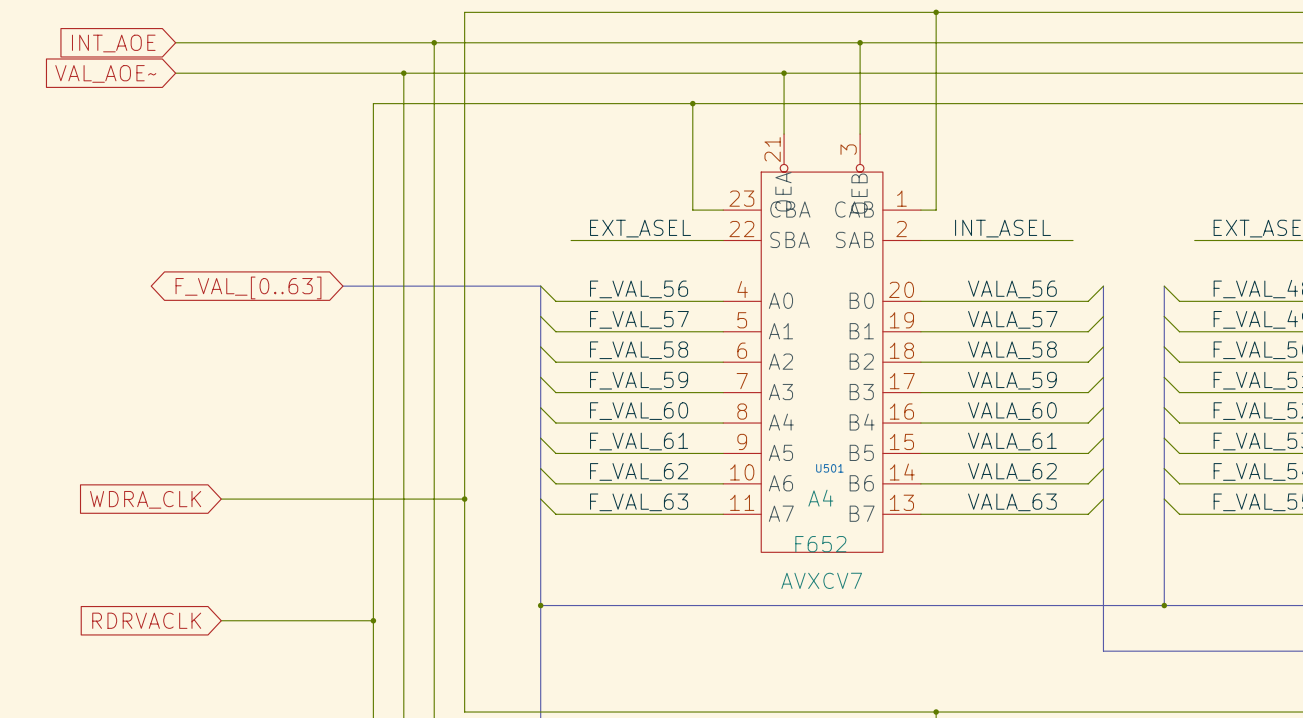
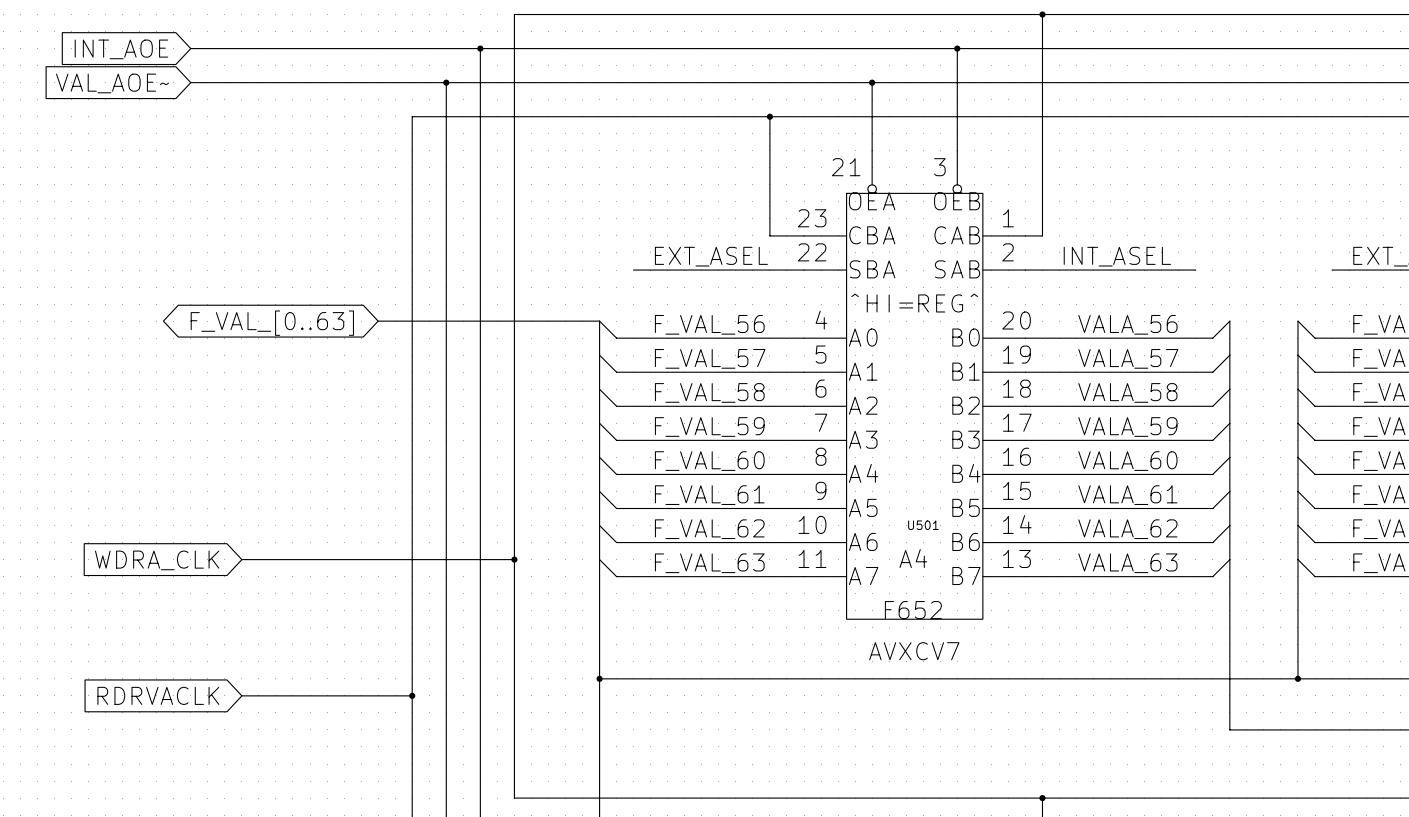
U501 symbol: [723, 134, 921, 553] -> [804, 150, 1026, 620]

